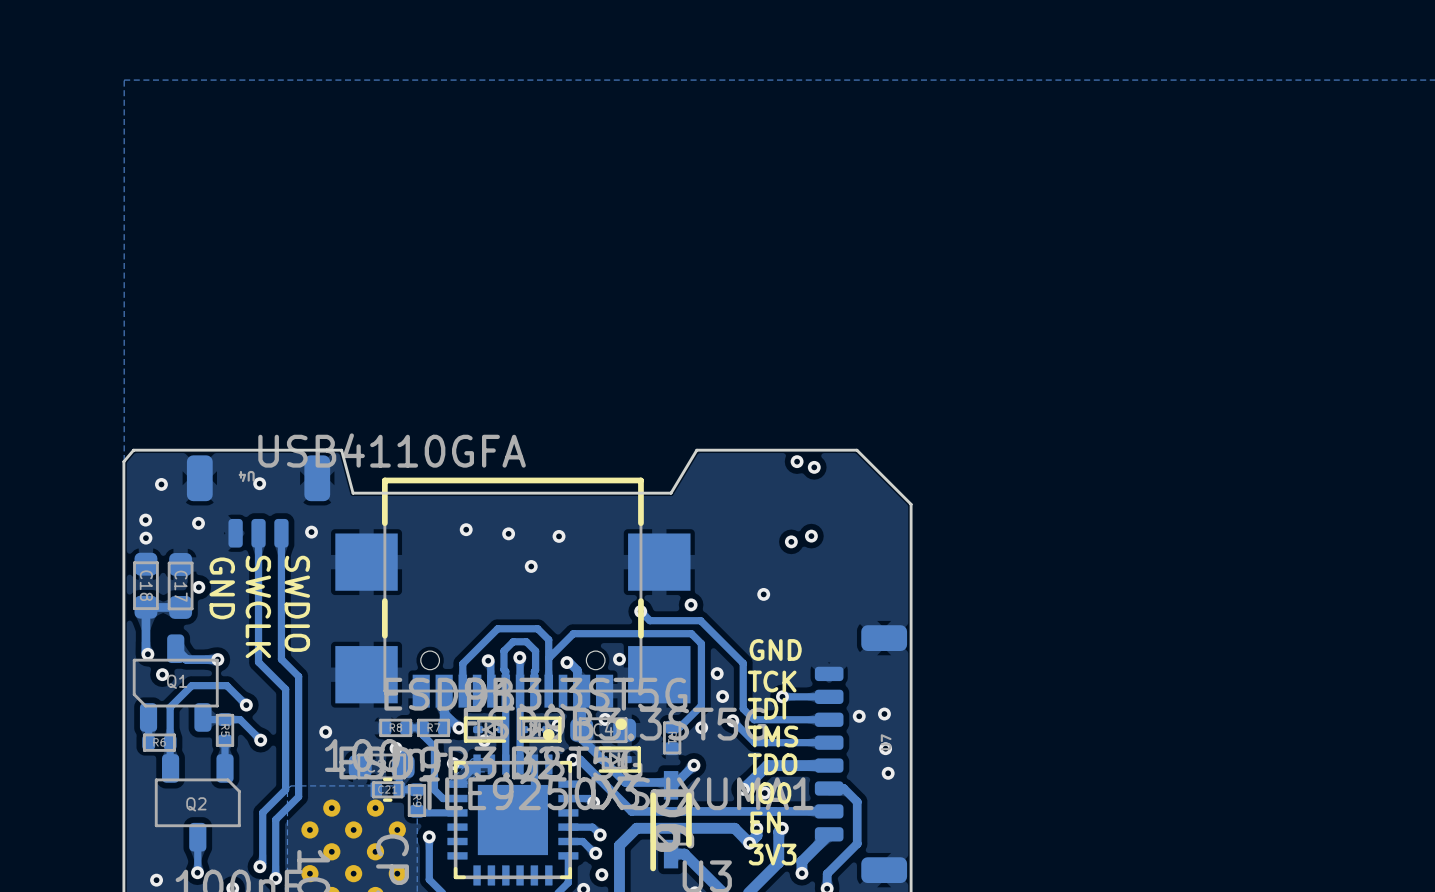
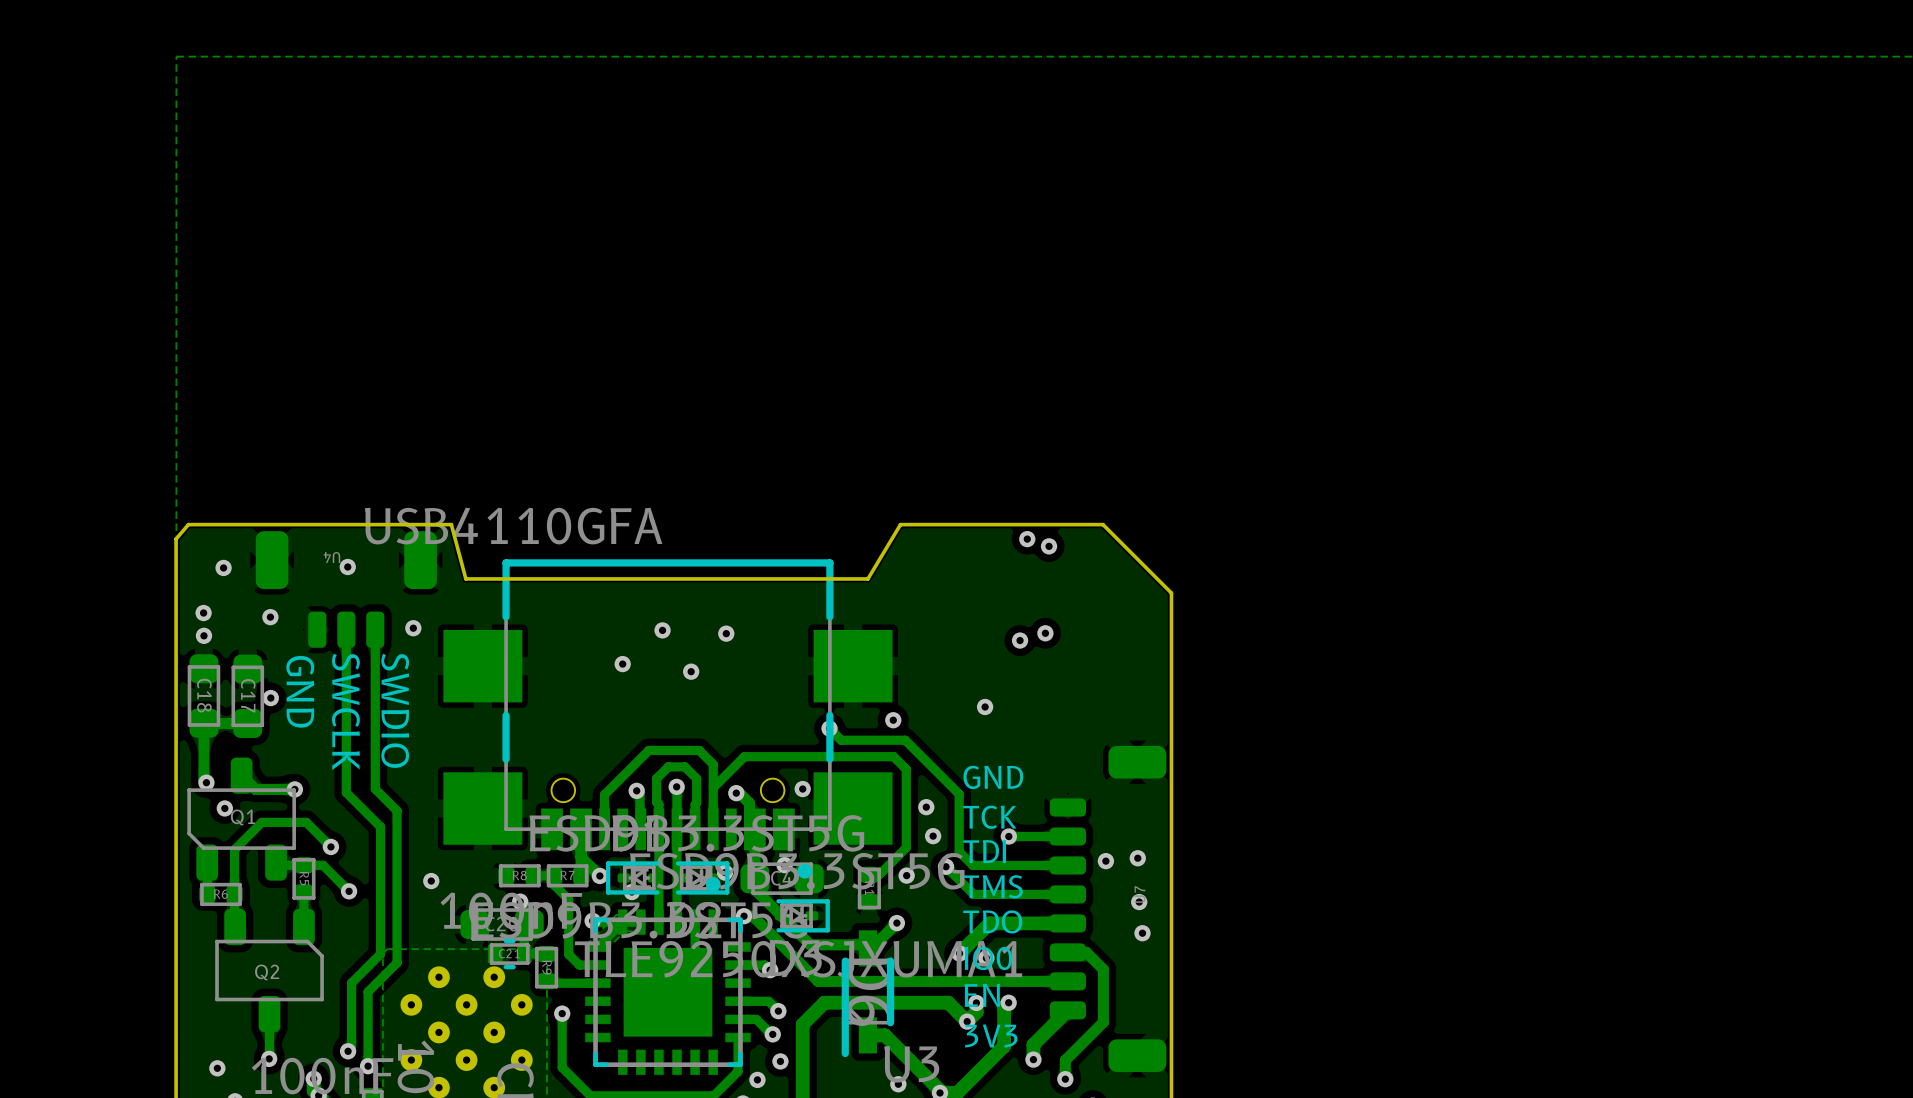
via position: (466, 529) -> (622, 664)

